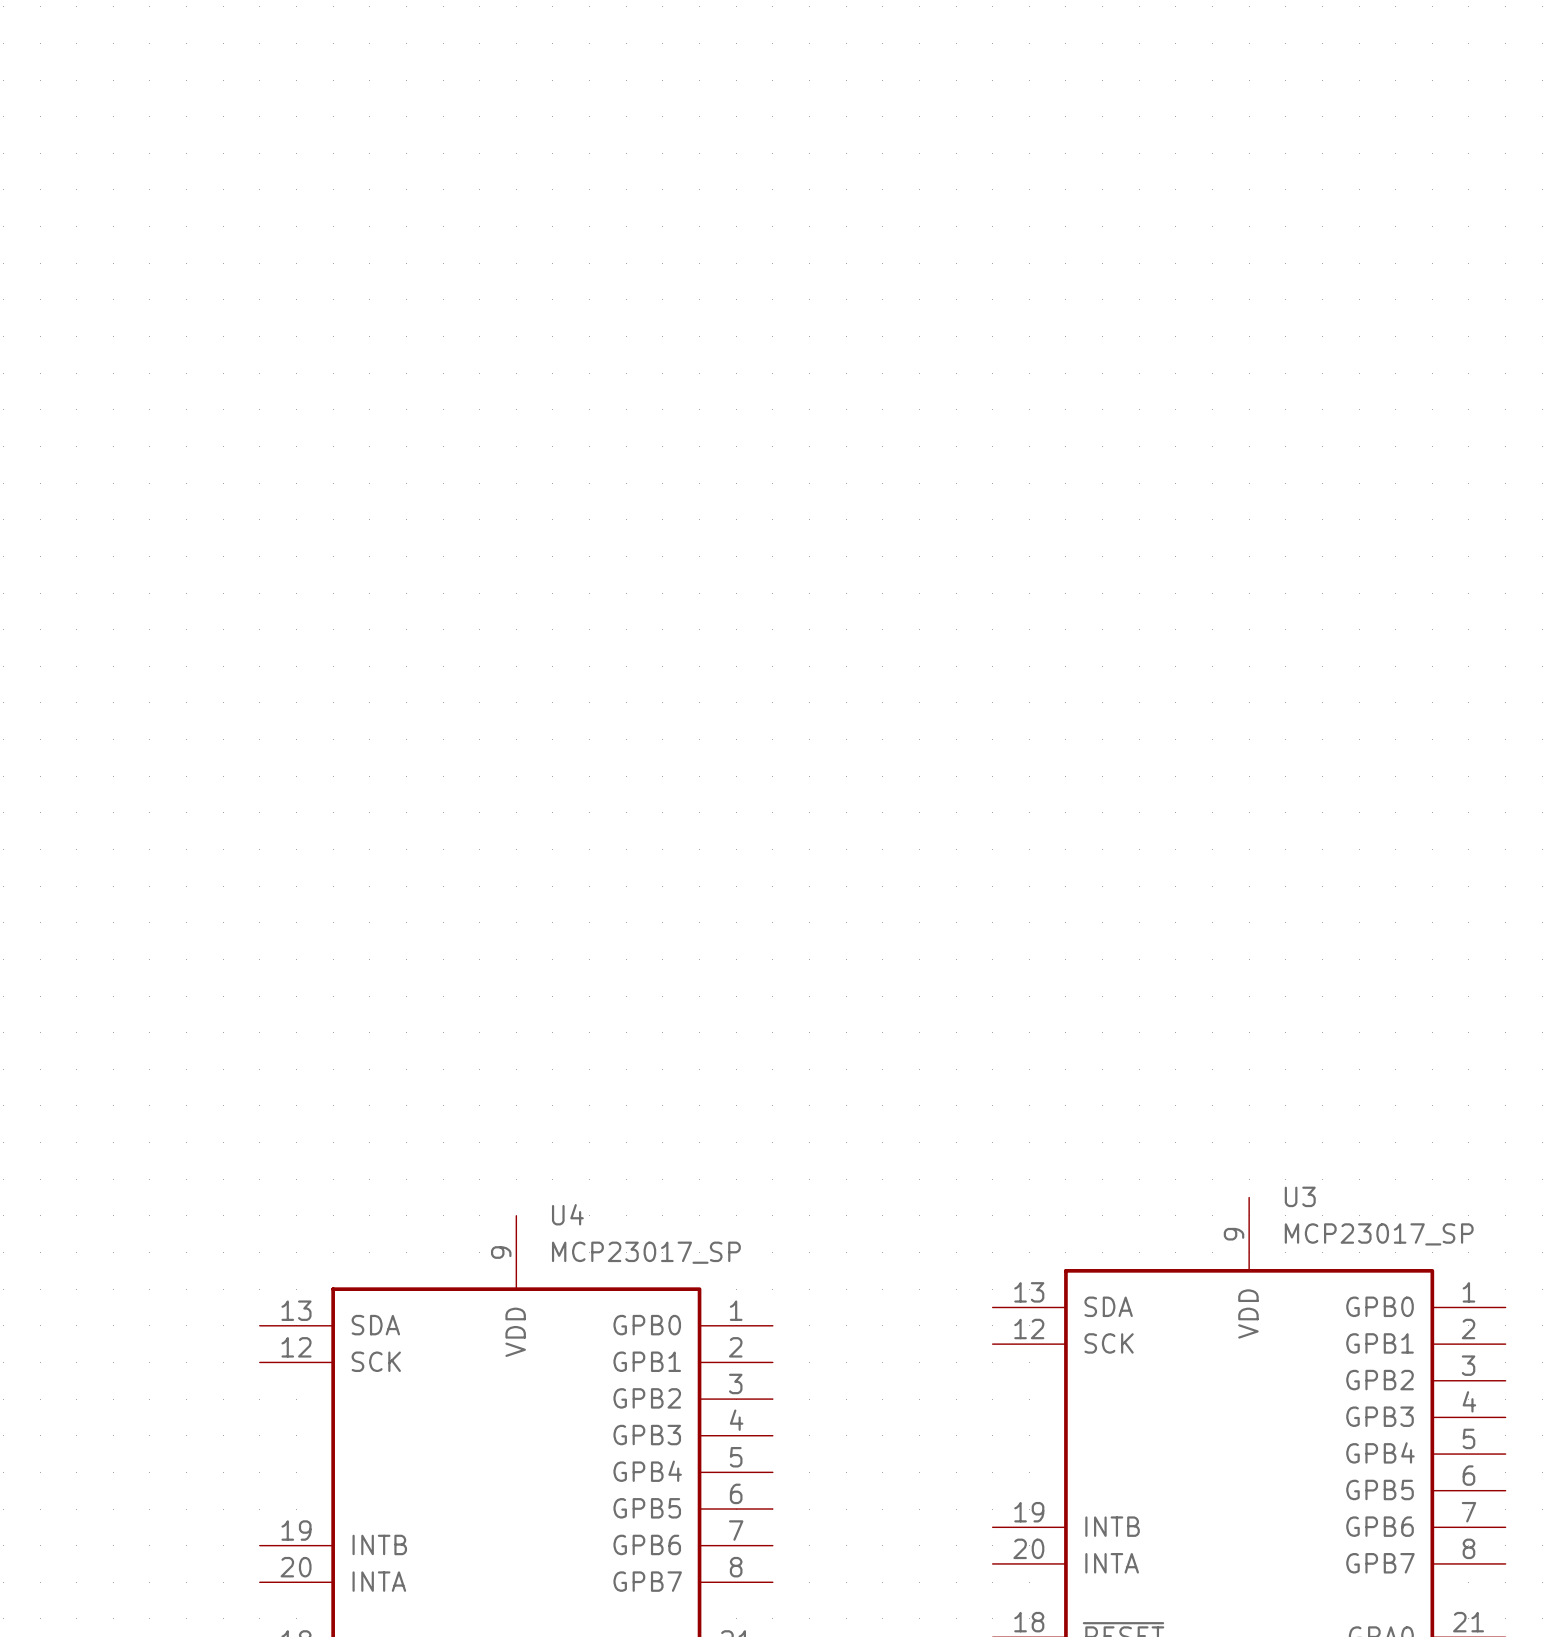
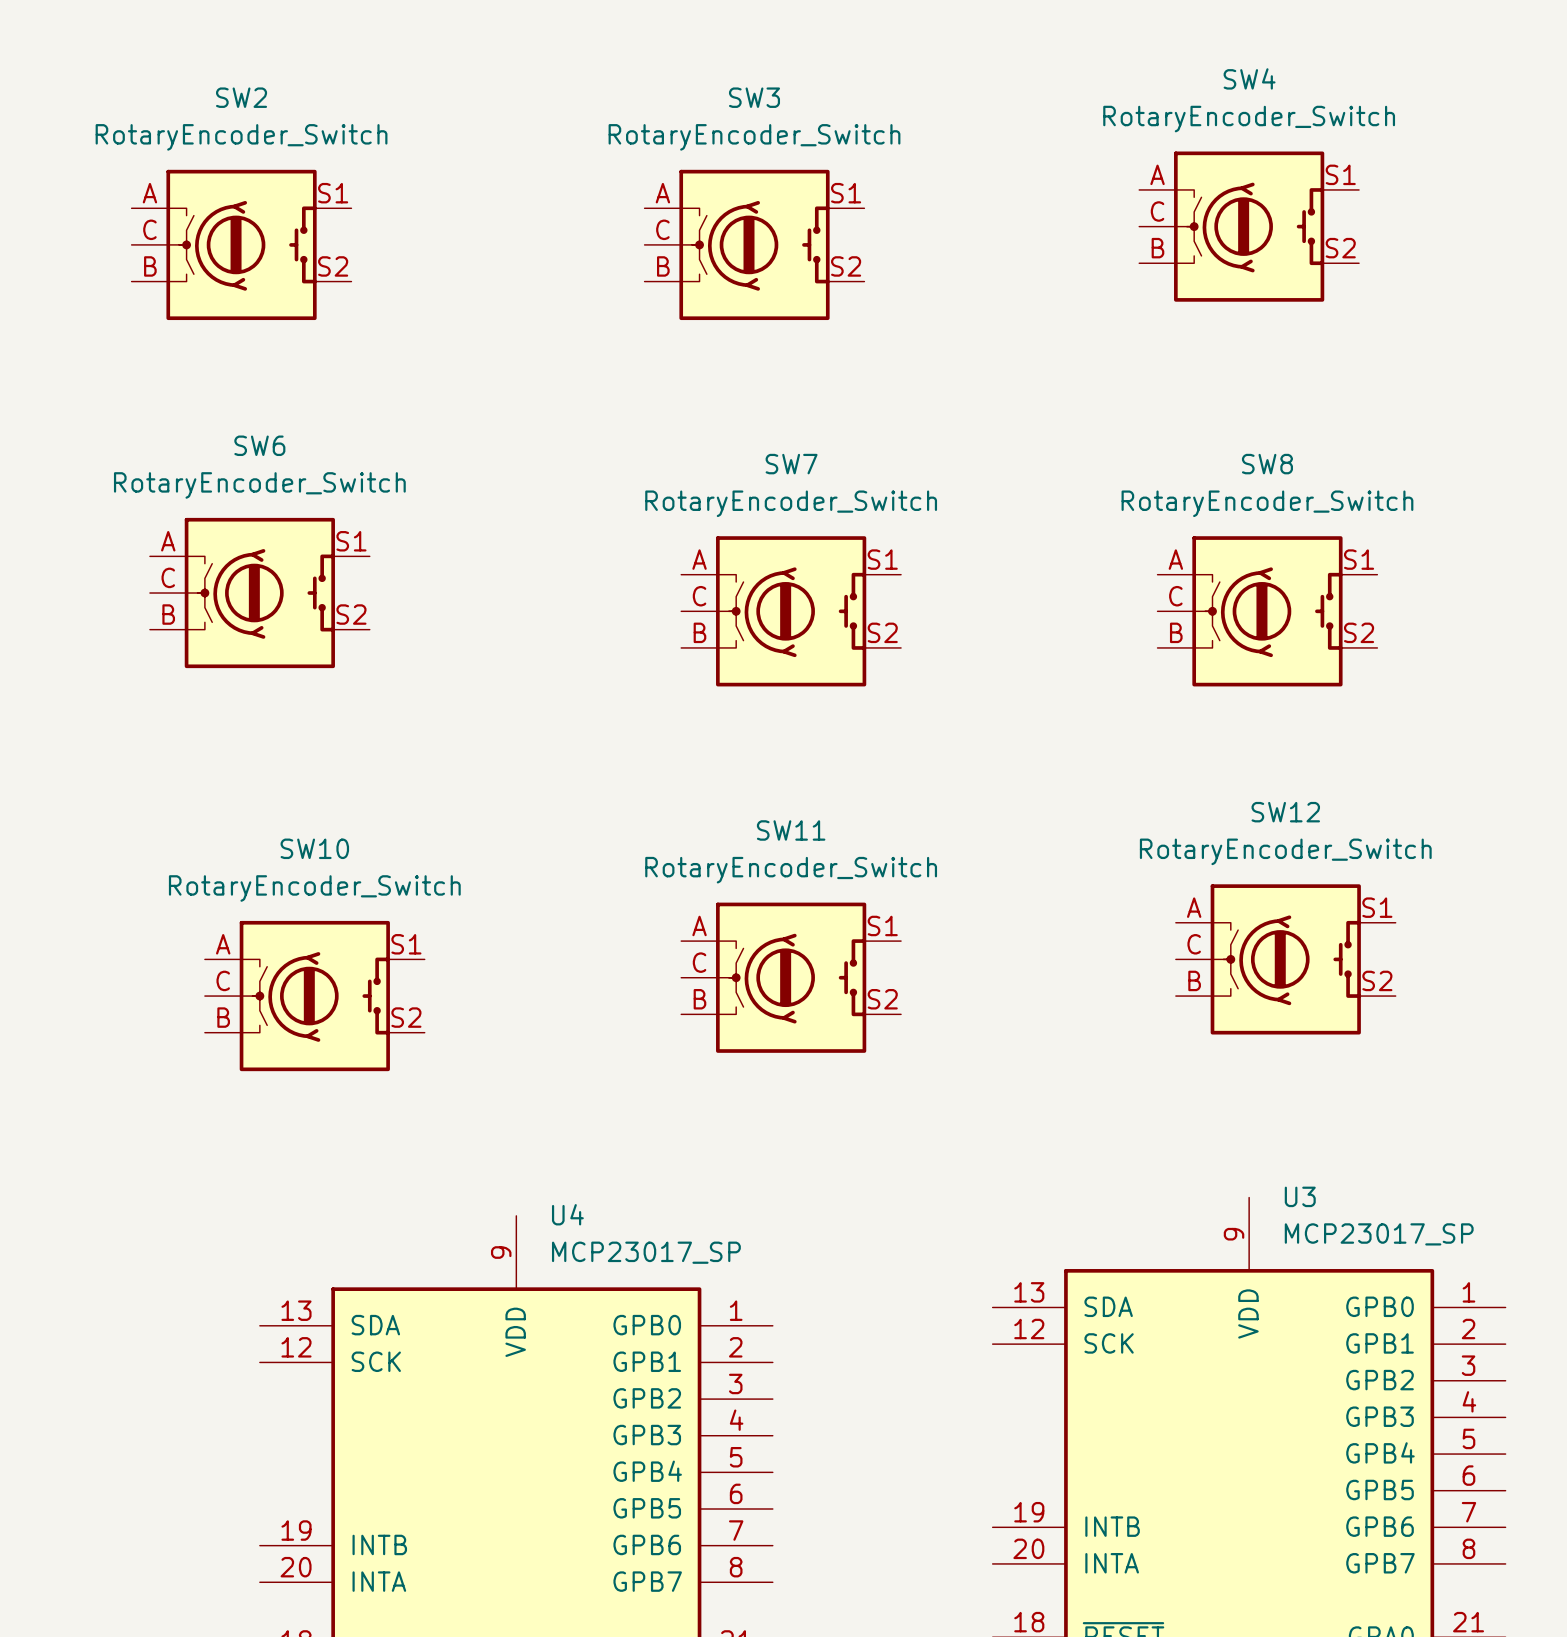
SW4: none -> RotaryEncoder_Switch (1249, 226)
SW2: none -> RotaryEncoder_Switch (241, 244)
SW3: none -> RotaryEncoder_Switch (754, 244)
SW6: none -> RotaryEncoder_Switch (259, 593)
SW7: none -> RotaryEncoder_Switch (791, 611)
SW8: none -> RotaryEncoder_Switch (1267, 611)
SW12: none -> RotaryEncoder_Switch (1285, 959)
SW11: none -> RotaryEncoder_Switch (791, 977)
SW10: none -> RotaryEncoder_Switch (314, 996)

